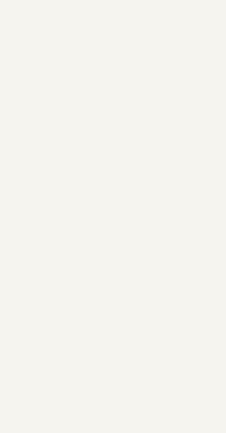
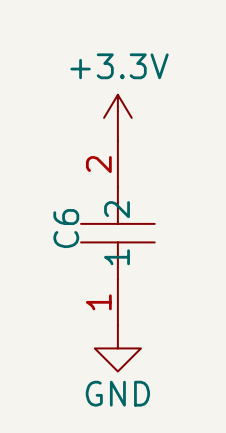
power symbol: none -> +3.3V (117, 117)
C6: none -> (117, 233)
power symbol: none -> GND (117, 348)

